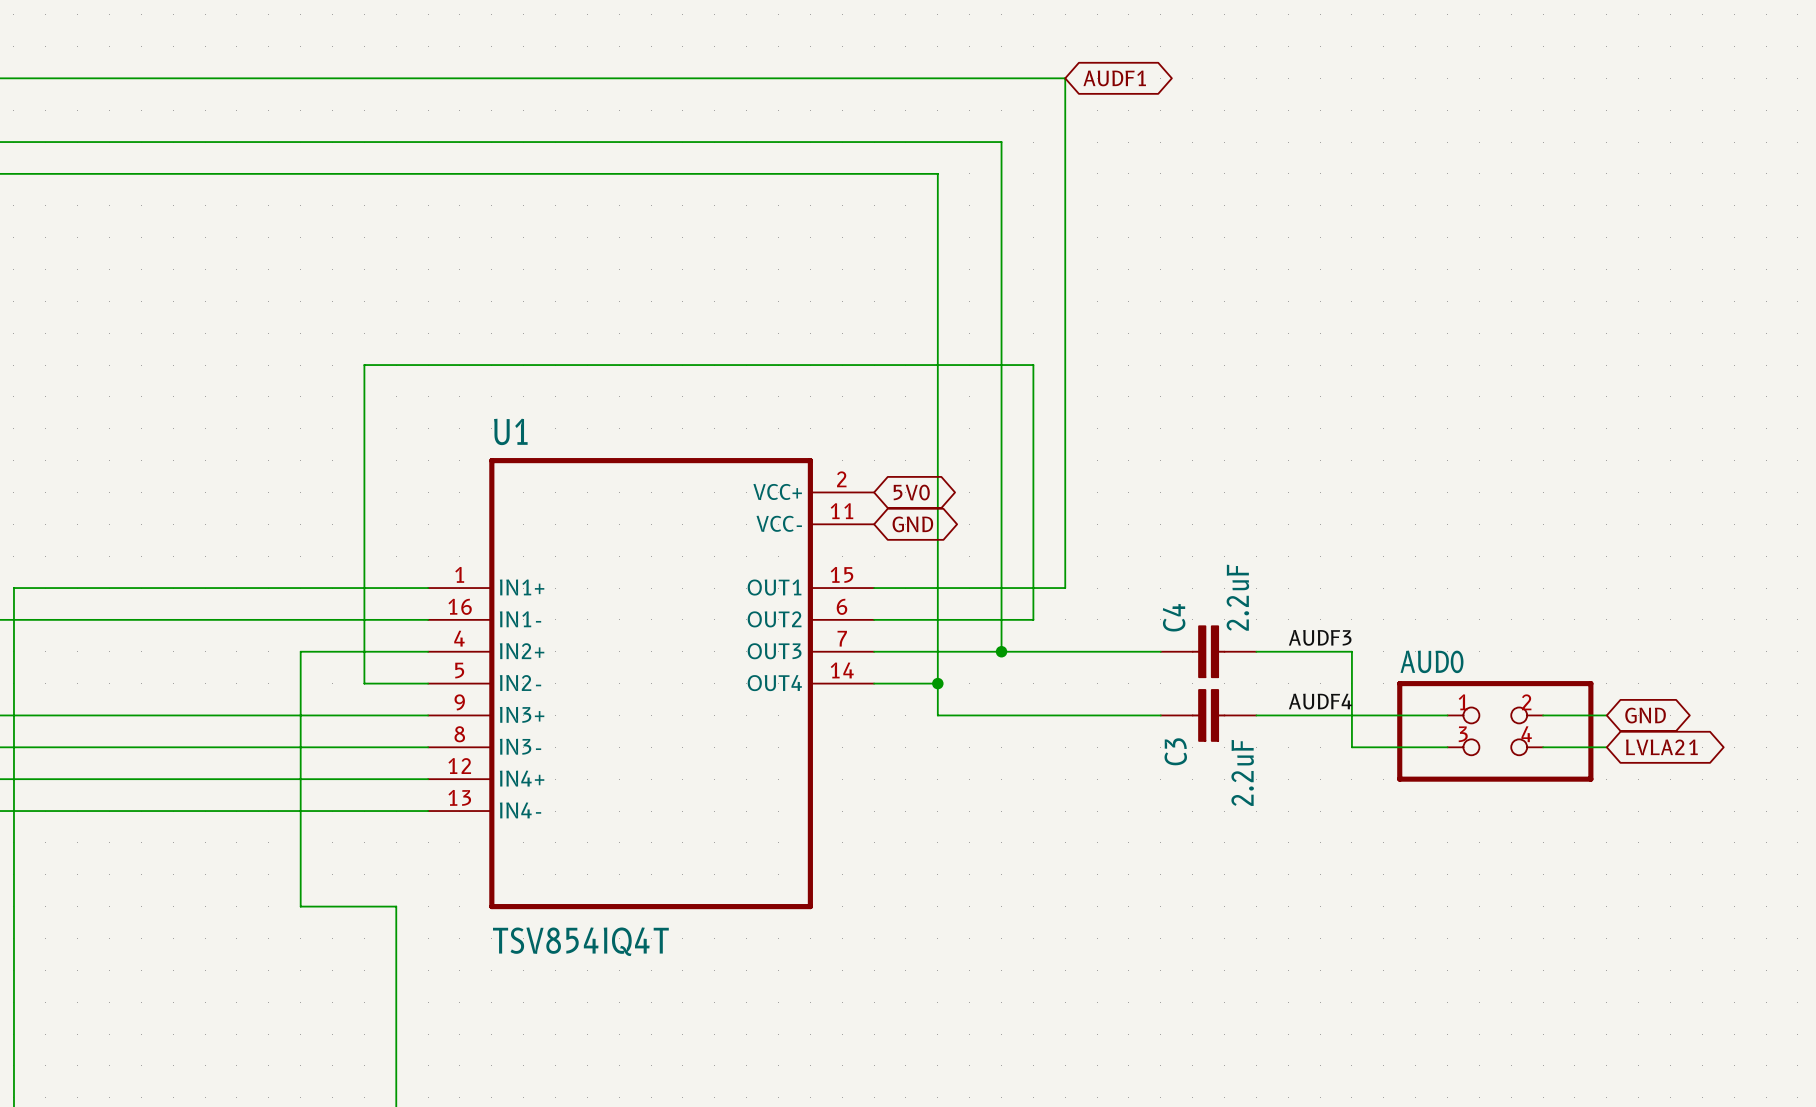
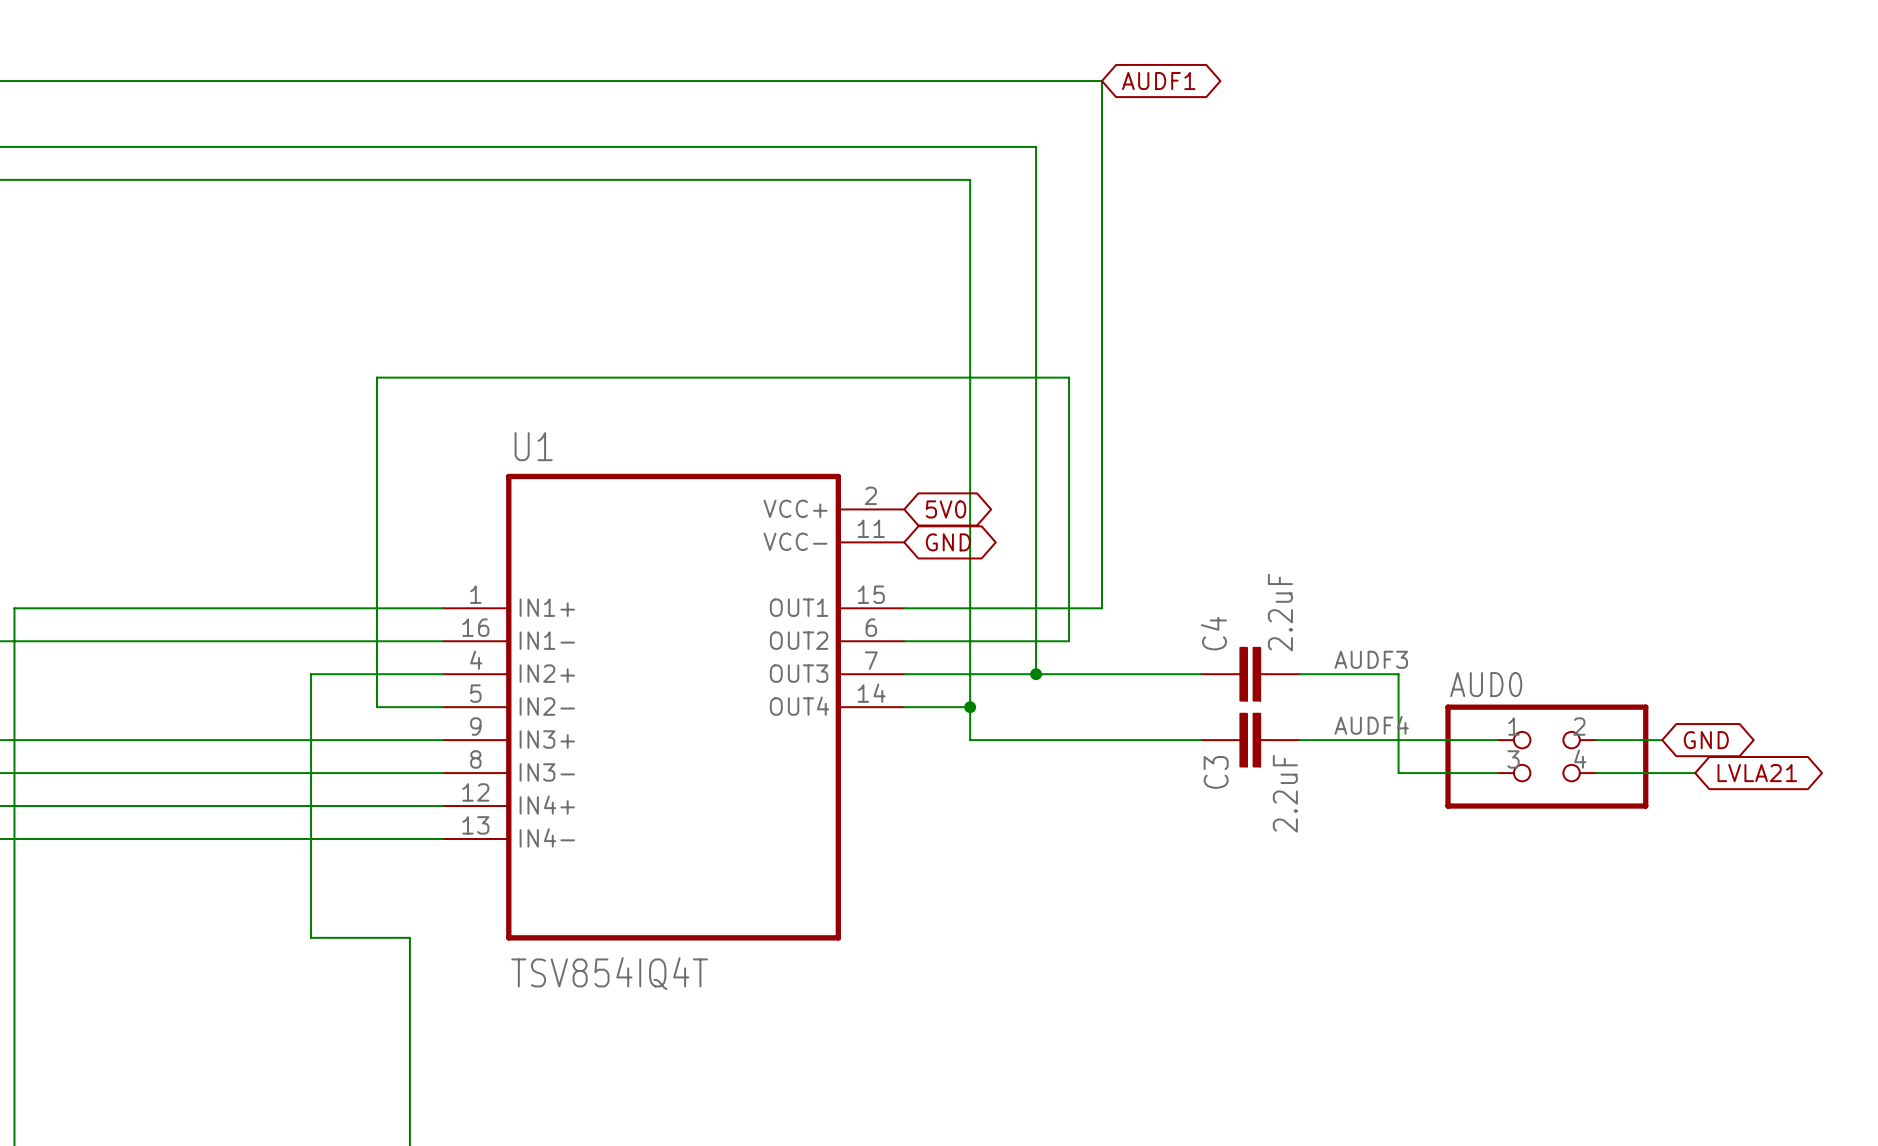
wire: none -> (1662, 773) (1695, 773)
global label position: LVLA21 (1661, 747) -> LVLA21 (1757, 773)

